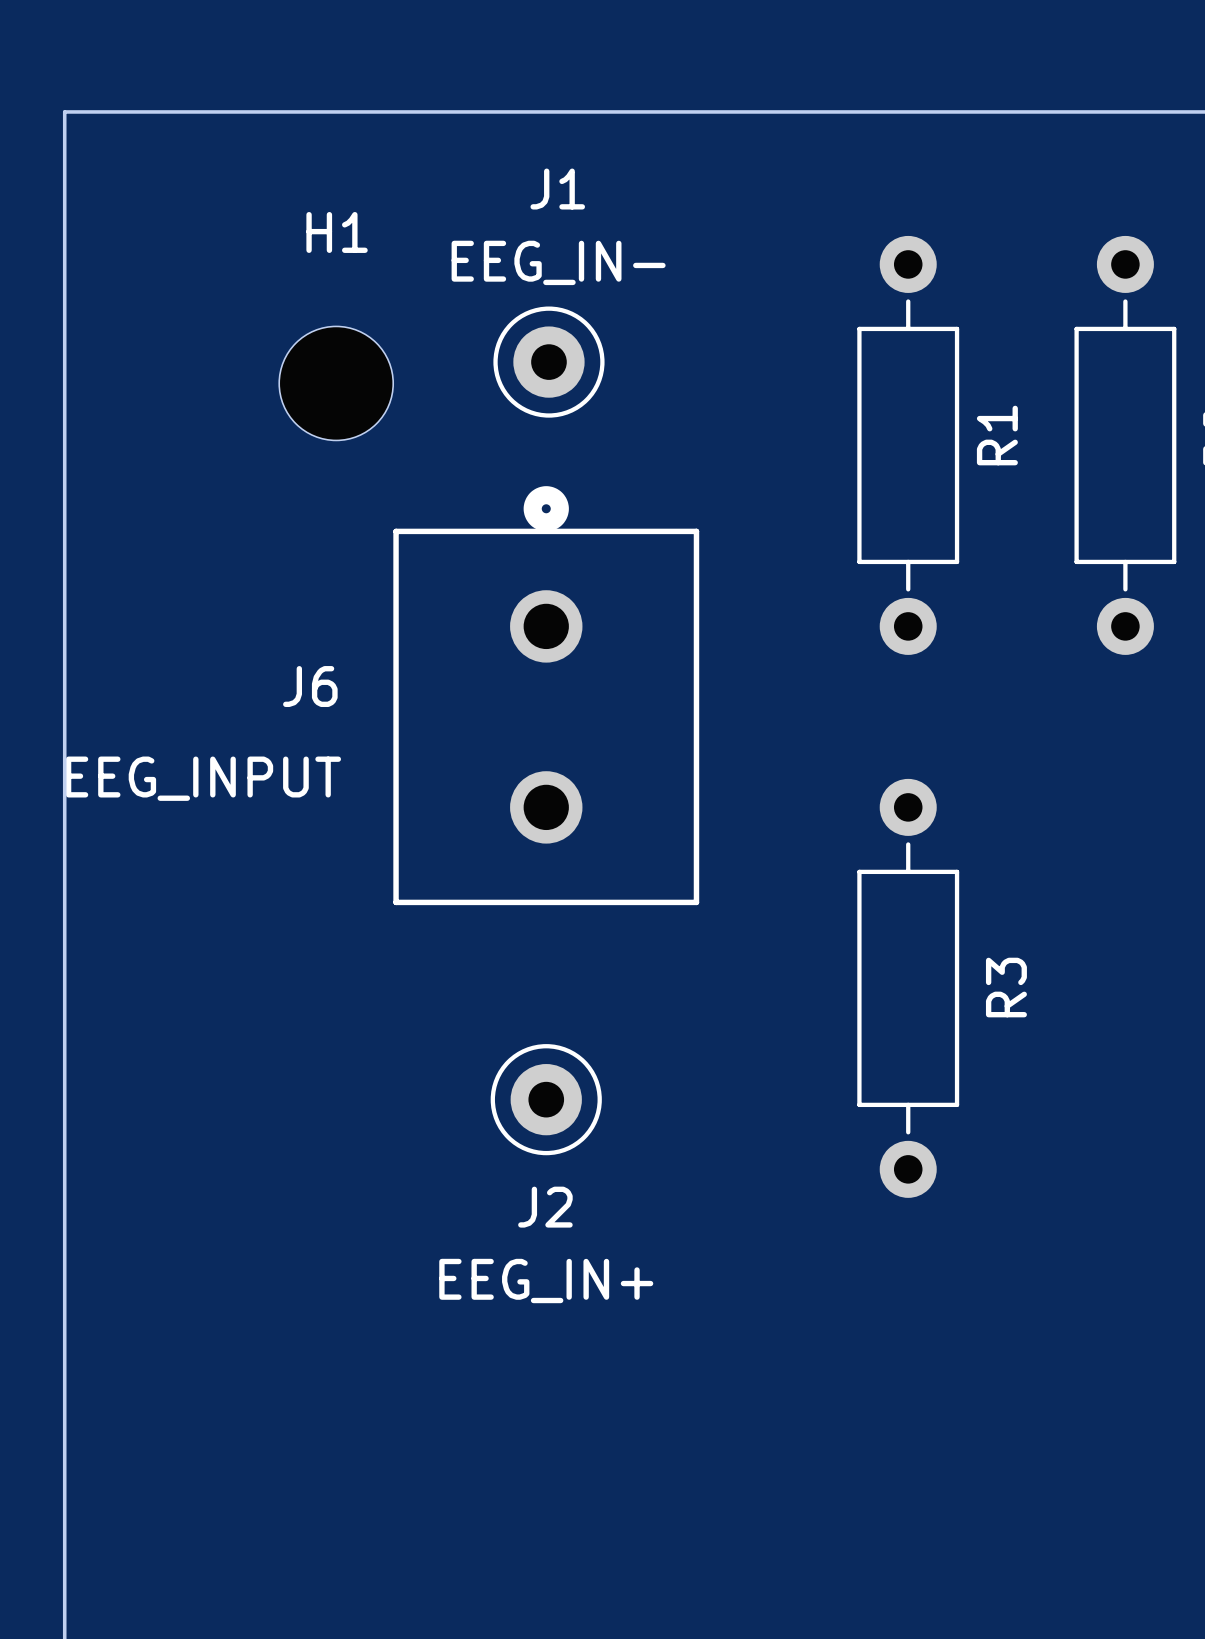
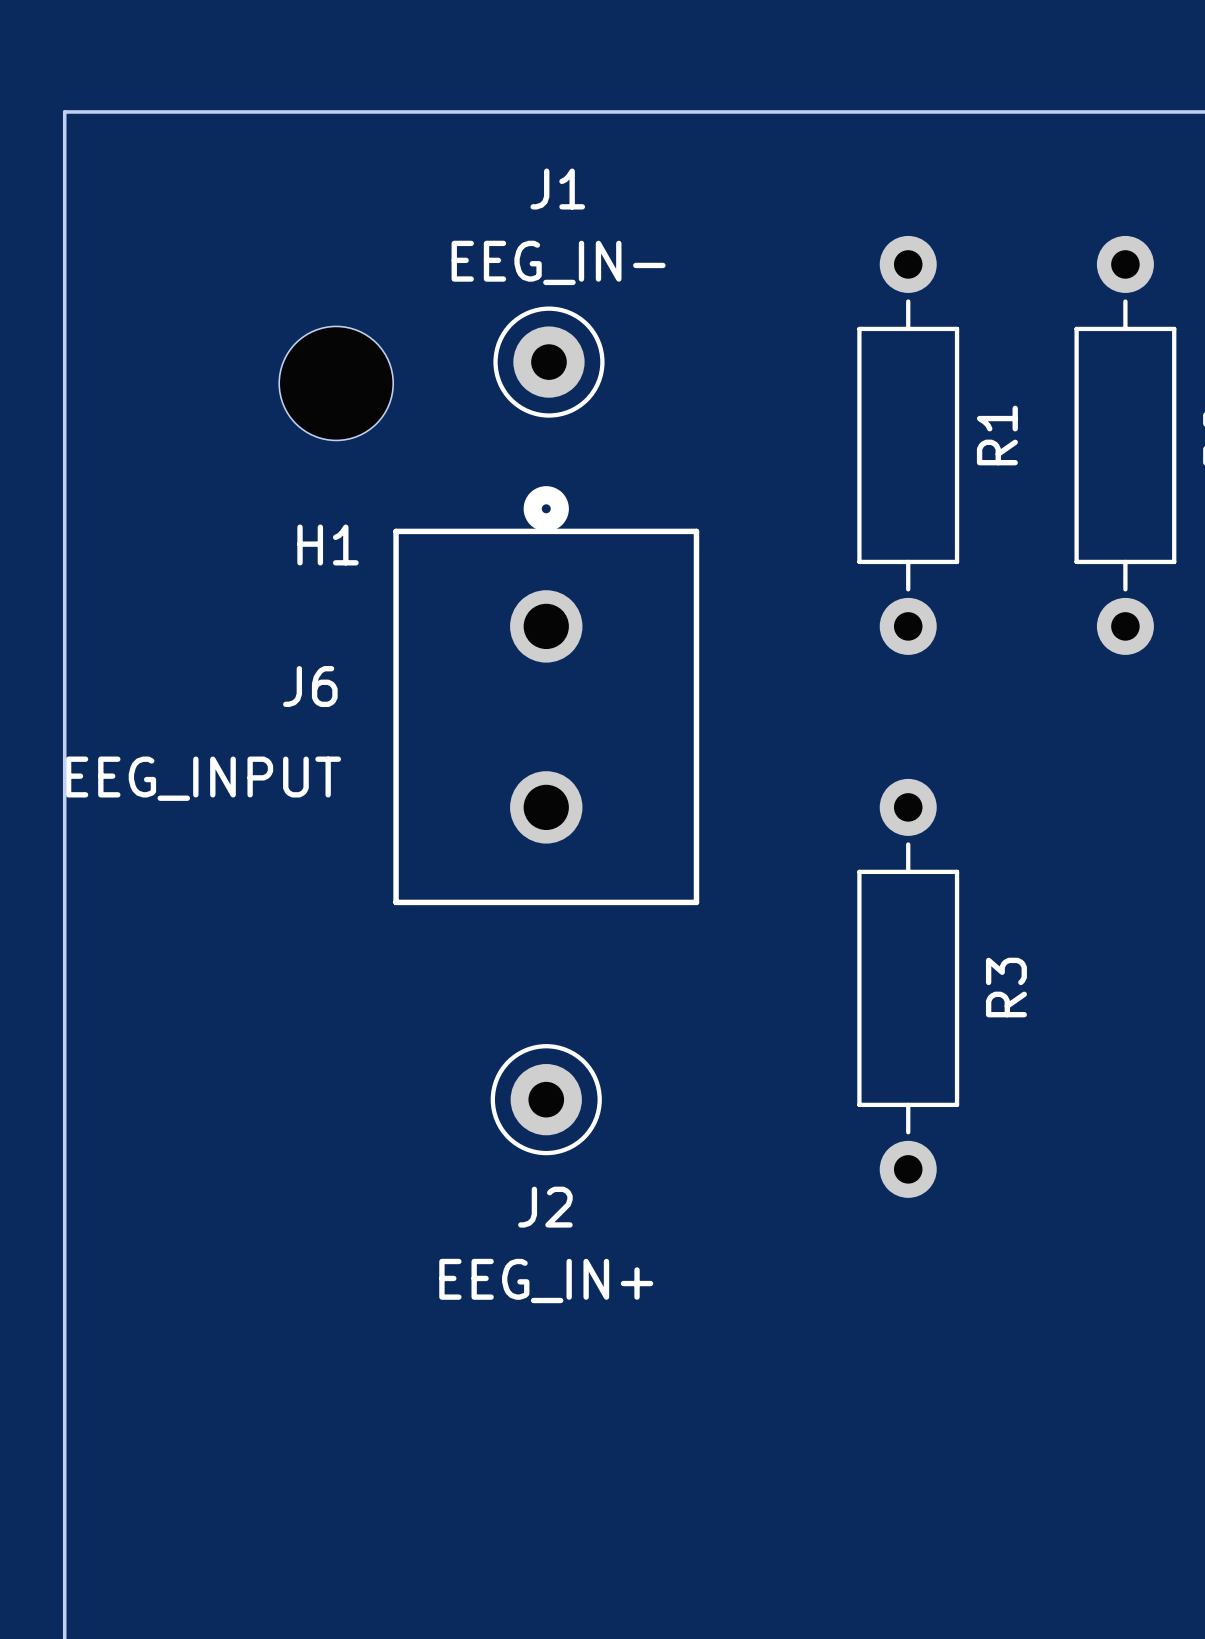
H1 name position: H1 (337, 232) -> H1 (328, 544)

